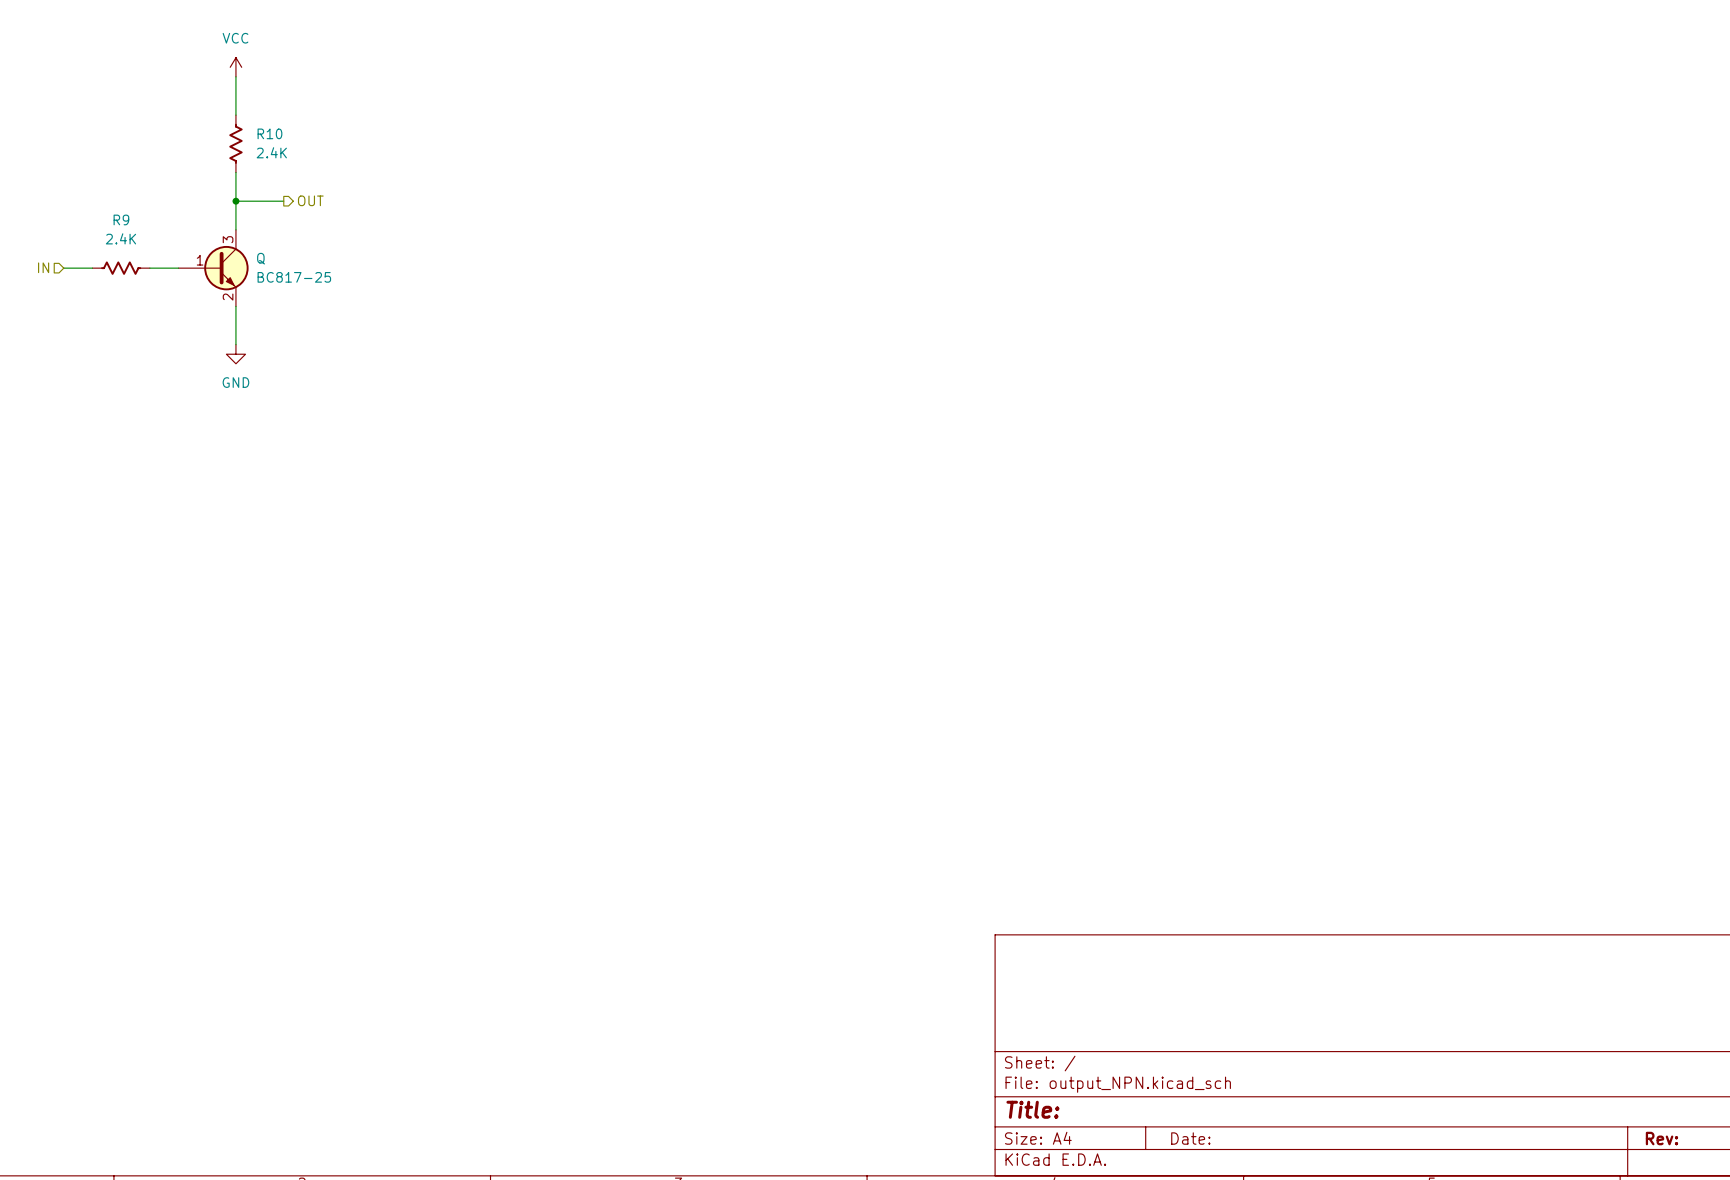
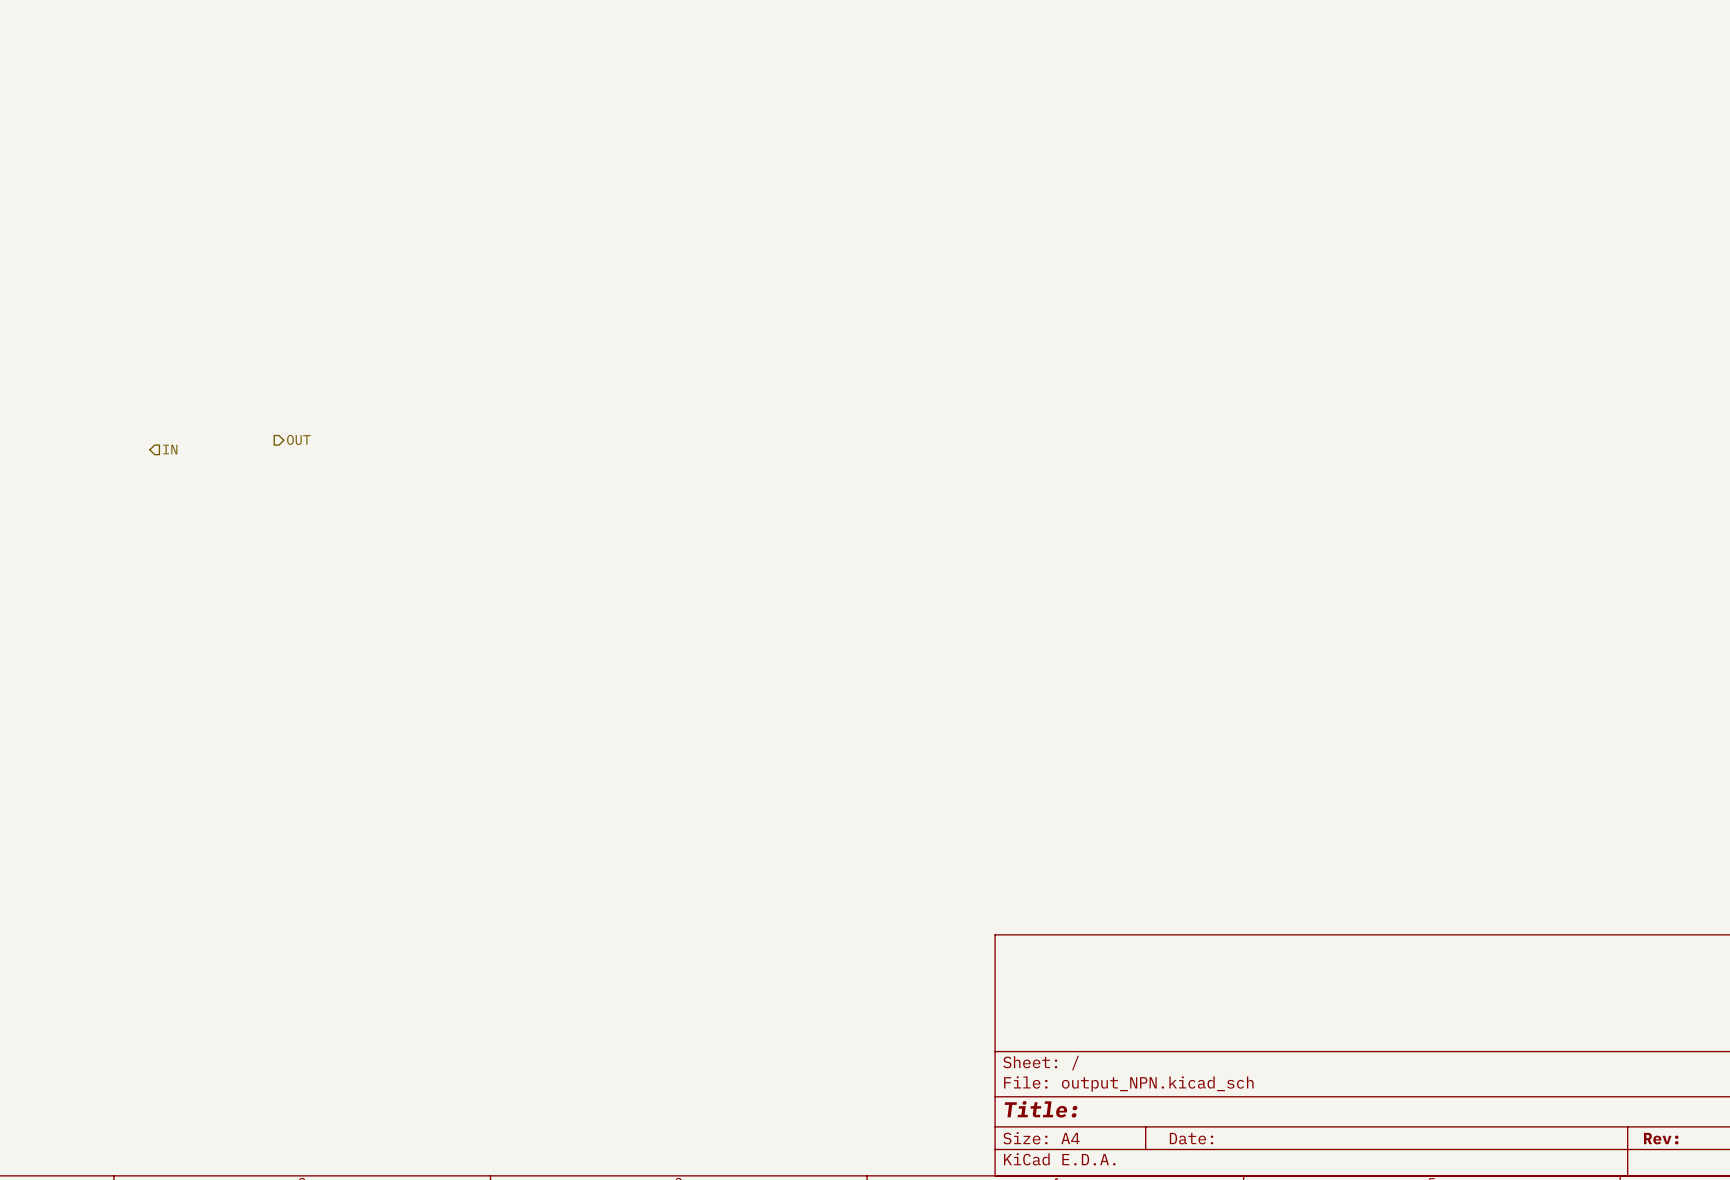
power symbol: VCC (235, 67) -> none
wire: (235, 76) (235, 115) -> none
R10: 2.4K (235, 143) -> none
wire: (235, 172) (235, 229) -> none
hierarchical label: OUT (310, 200) -> none
wire: (235, 201) (283, 201) -> none
junction: (235, 201) -> none
hierarchical label: IN (43, 267) -> none
wire: (63, 268) (92, 268) -> none
R9: 2.4K (121, 268) -> none
wire: (149, 268) (178, 268) -> none
Q: BC817-25 (213, 268) -> none
wire: (235, 306) (235, 344) -> none
power symbol: GND (235, 354) -> none
hierarchical label: none -> OUT (298, 439)
hierarchical label: none -> IN (170, 449)

